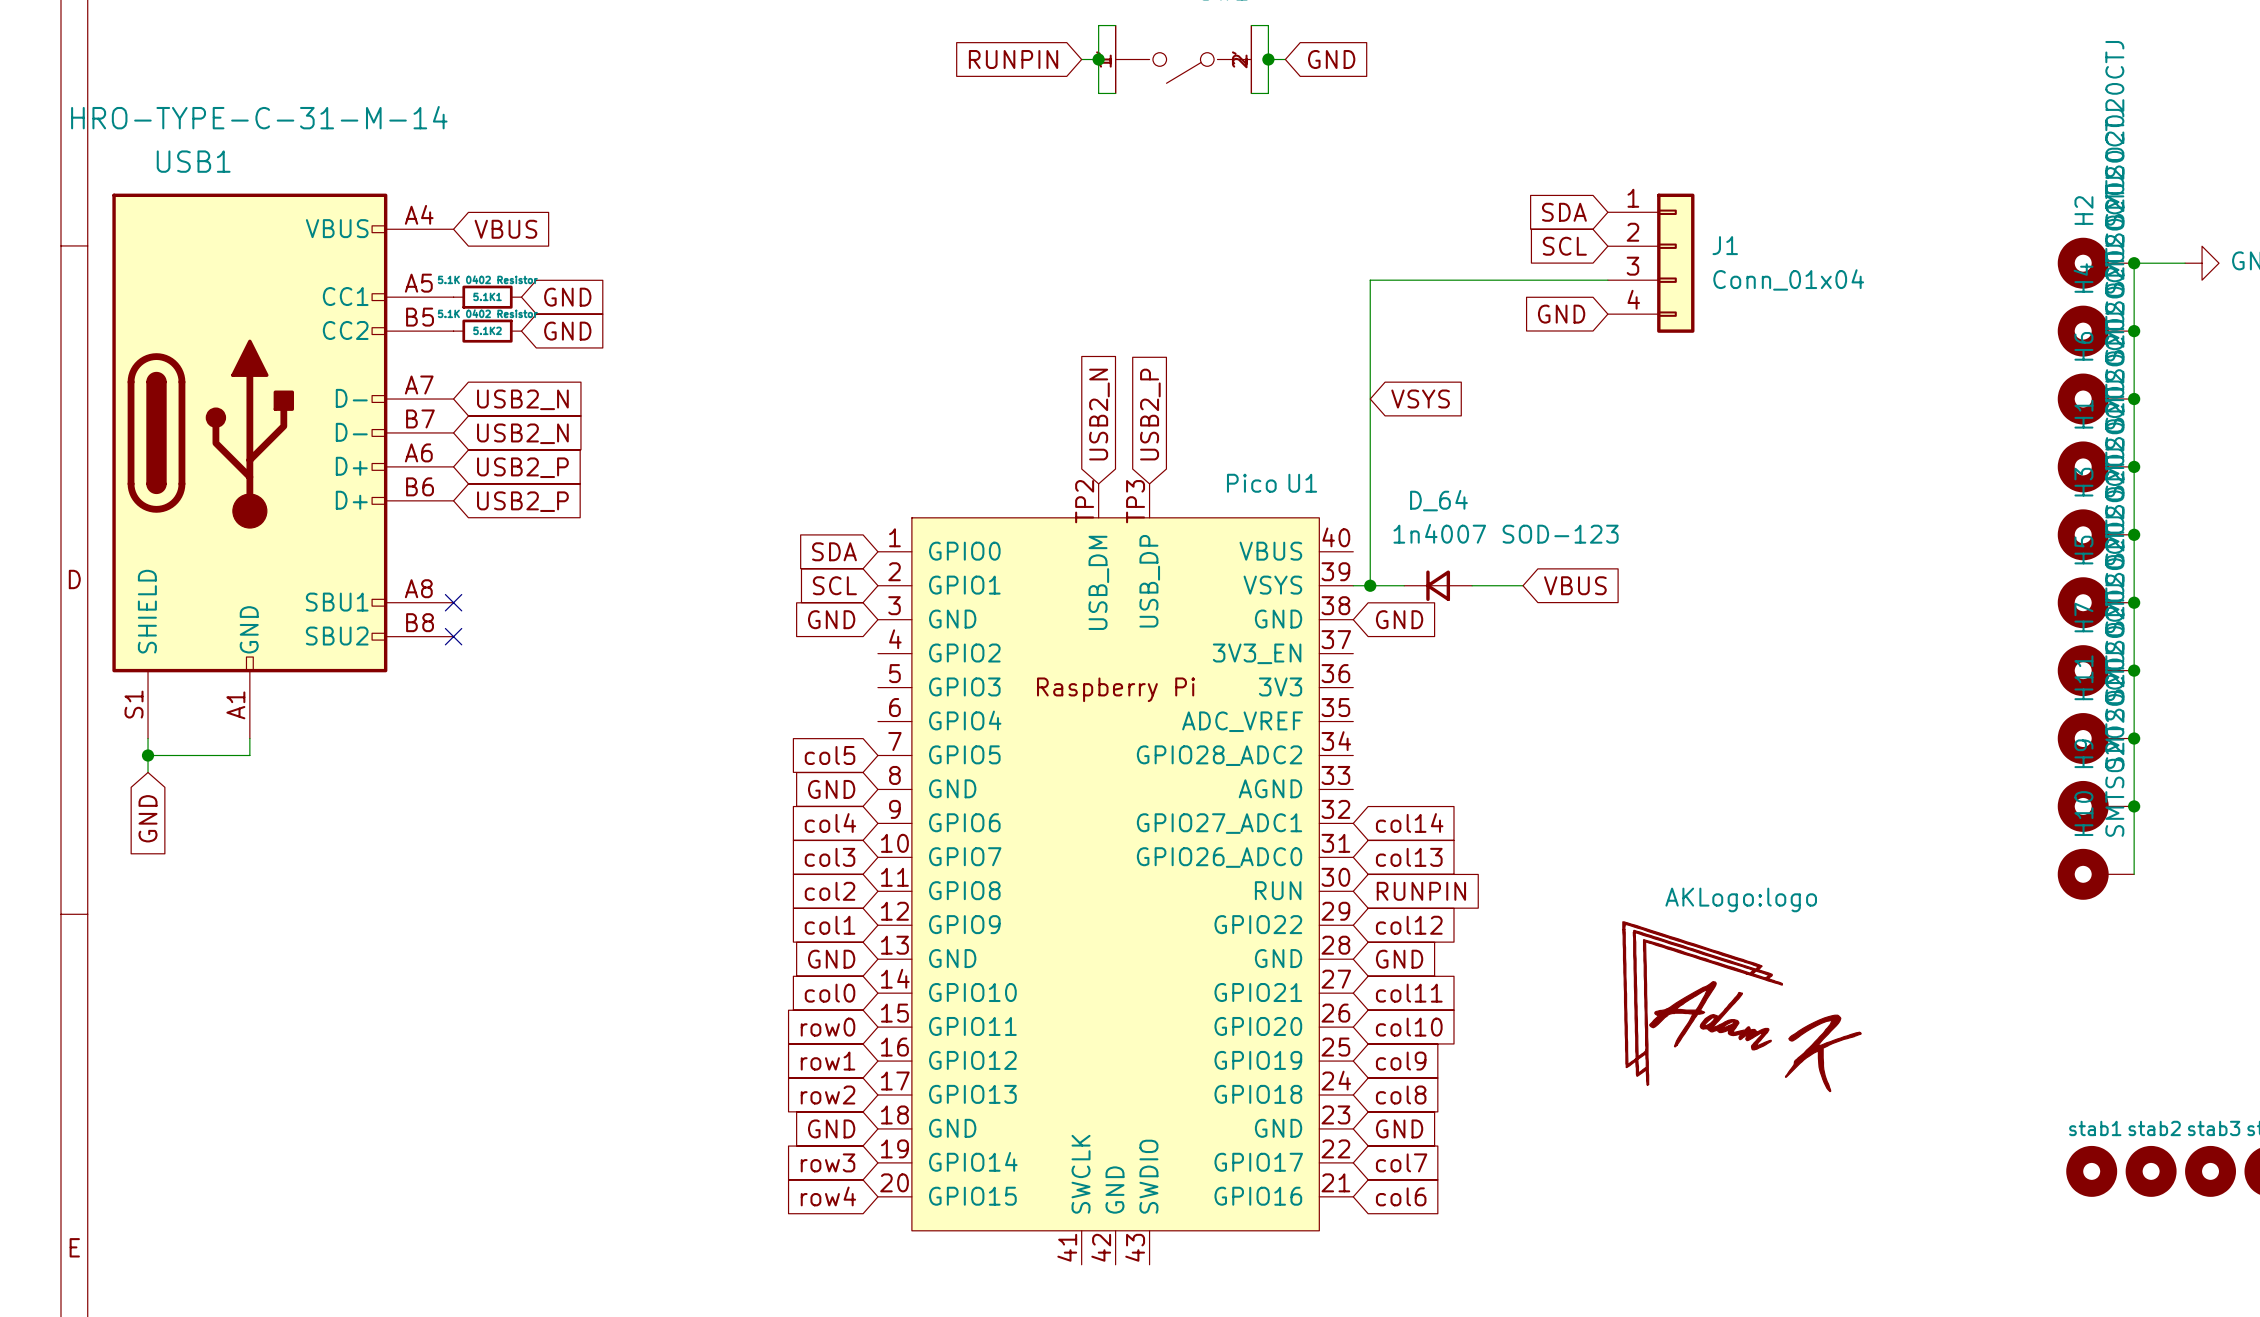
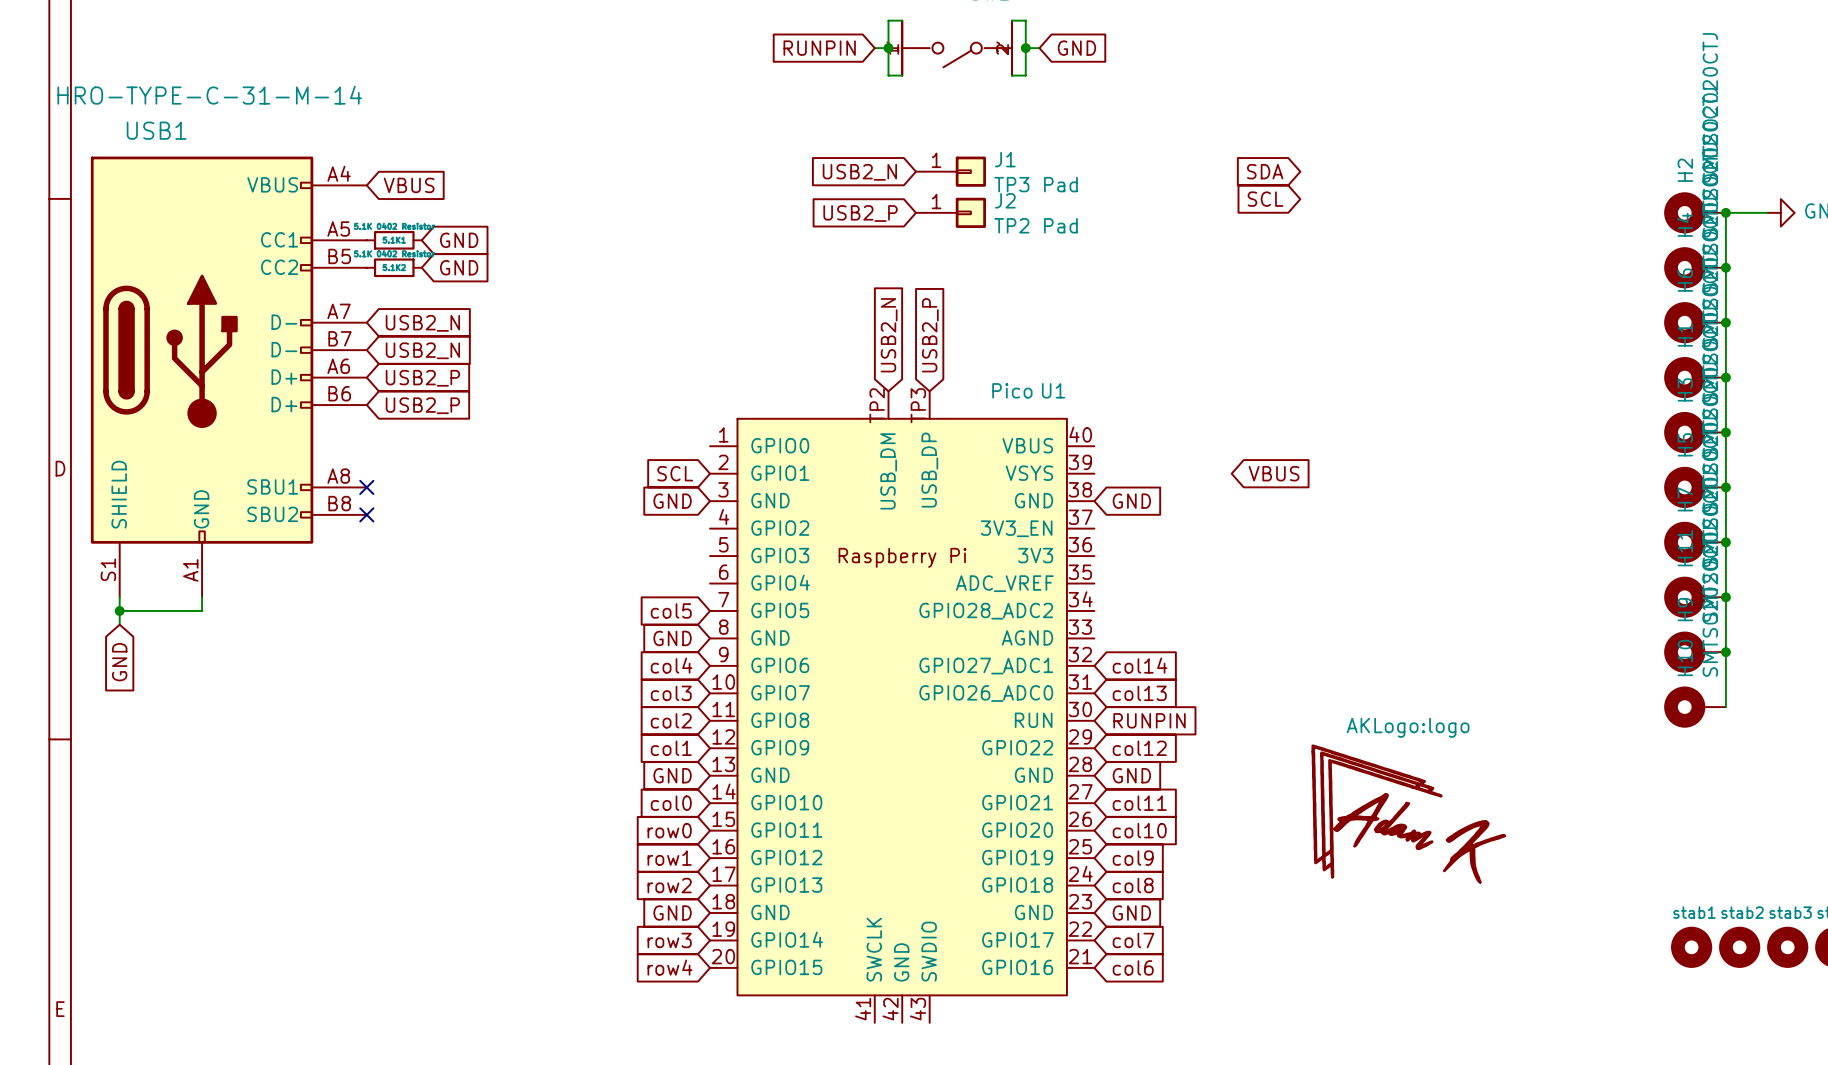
J1 symbol: [1607, 193, 1695, 333] -> [915, 156, 986, 187]
global label: none -> USB2_N (859, 172)
J2: none -> TP2 Pad (950, 212)
global label: none -> USB2_P (860, 213)
J1 value: Conn_01x04 (1788, 279) -> TP3 Pad (1036, 184)
wire: (1607, 280) (1370, 280) (1370, 585) -> none
global label: GND (1561, 314) -> none
global label: VSYS (1420, 399) -> none
global label: SDA (834, 551) -> none
wire: (1353, 585) (1404, 585) -> none
junction: (1370, 585) -> none
D_64: 1n4007 SOD-123 (1438, 585) -> none
wire: (1472, 585) (1523, 585) -> none

